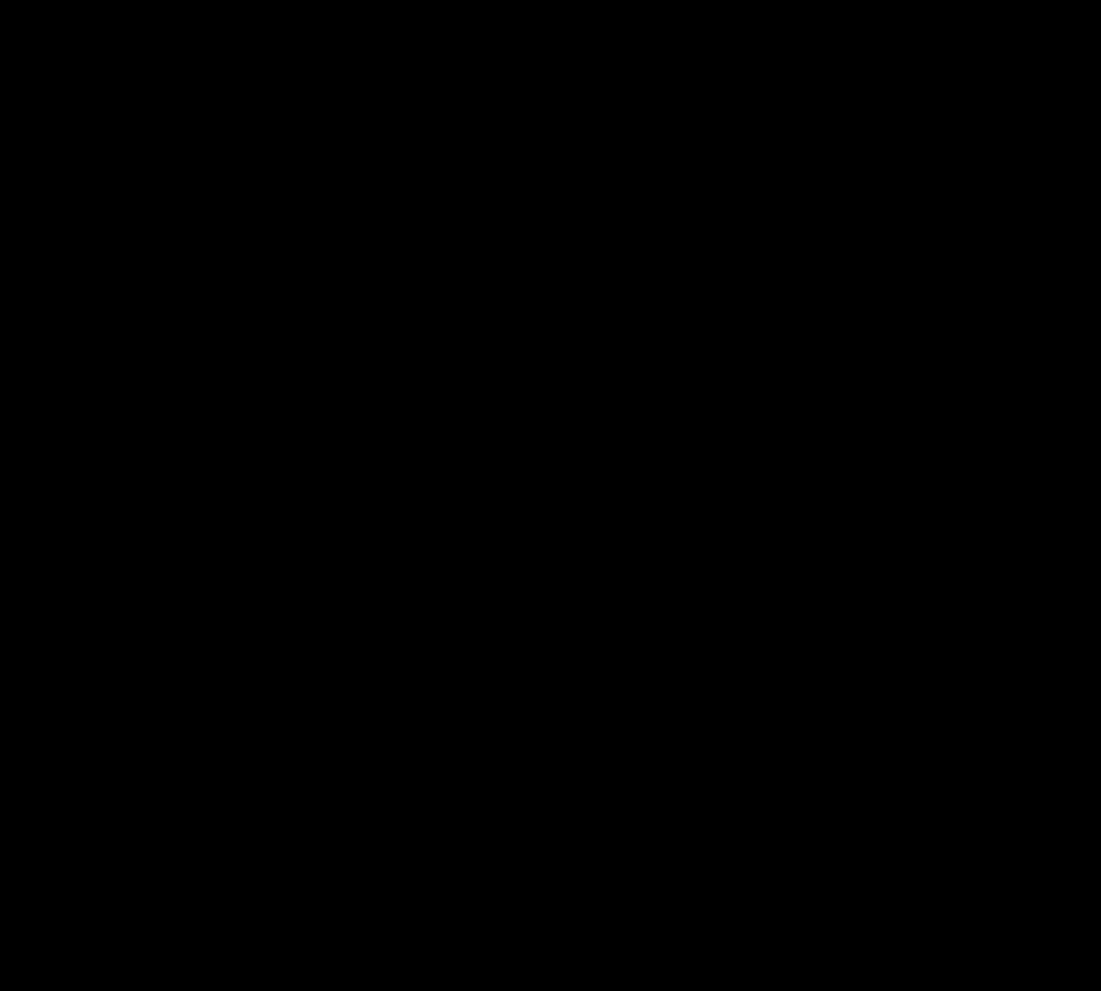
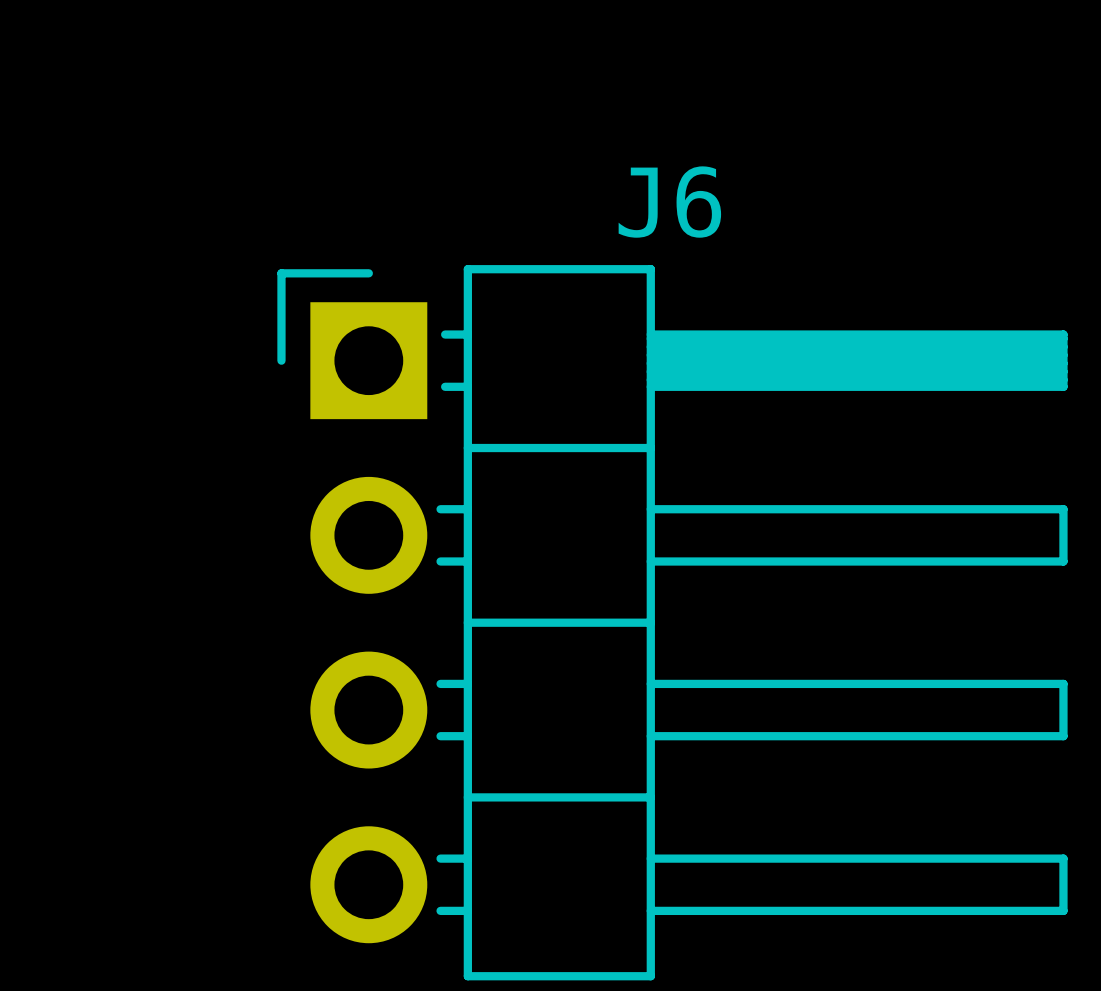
J6: none -> (672, 622)

